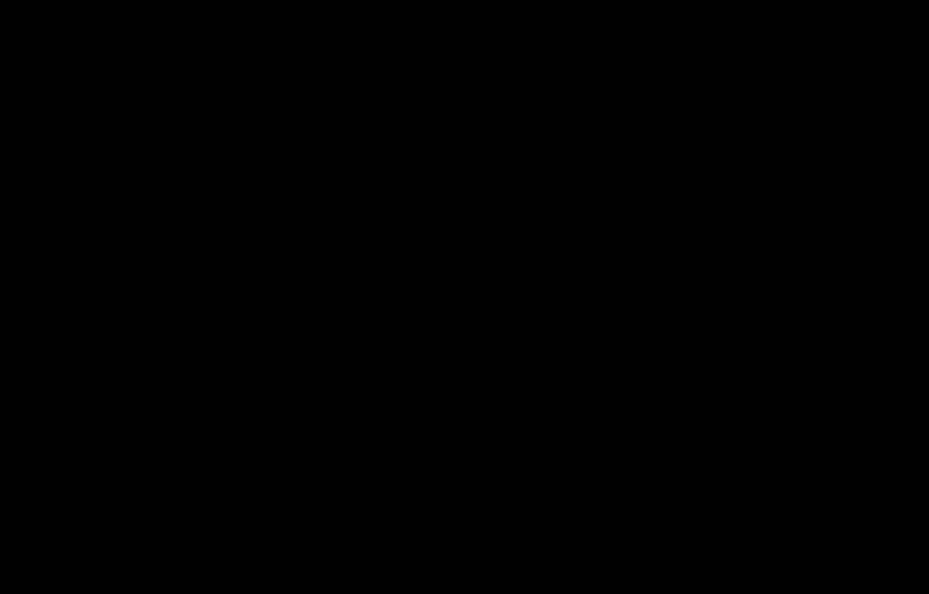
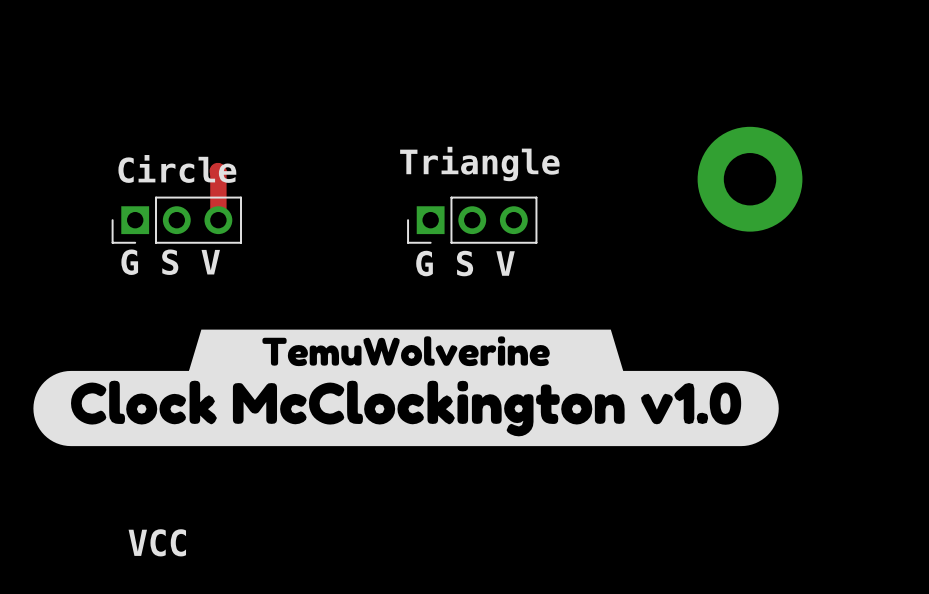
top track: none -> (217, 171) (218, 220)
part: none -> (750, 179)
Circle: none -> (176, 220)
Triangle: none -> (472, 220)
text: none -> G S V (170, 262)
text: none -> G S V (465, 263)
drawing: none -> [33, 329, 779, 447]
text: none -> VCC (157, 542)

